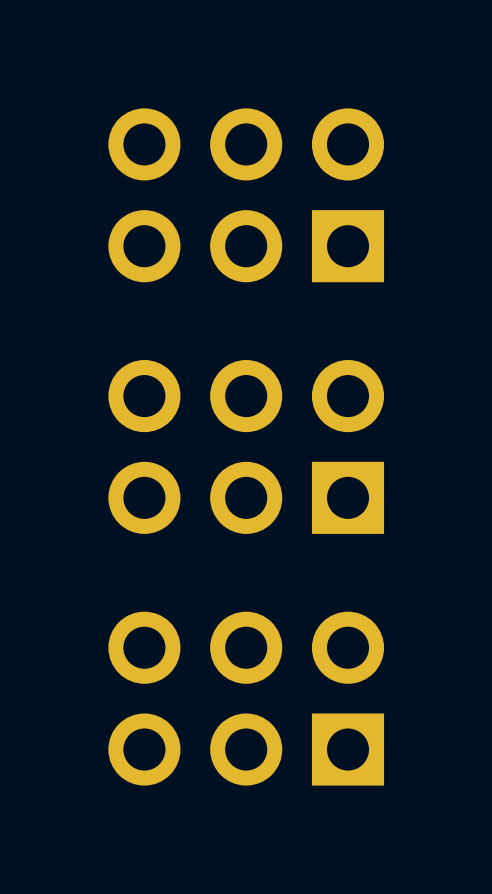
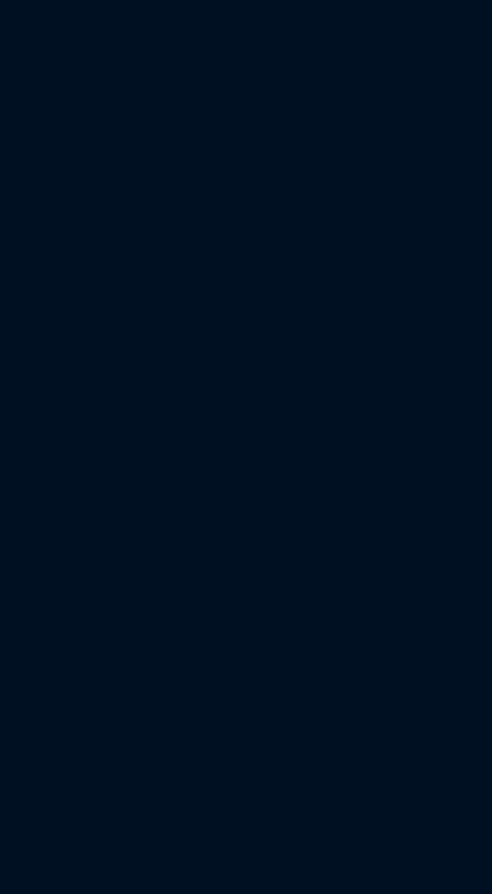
part: (246, 195) -> none
part: (246, 446) -> none
part: (246, 698) -> none

